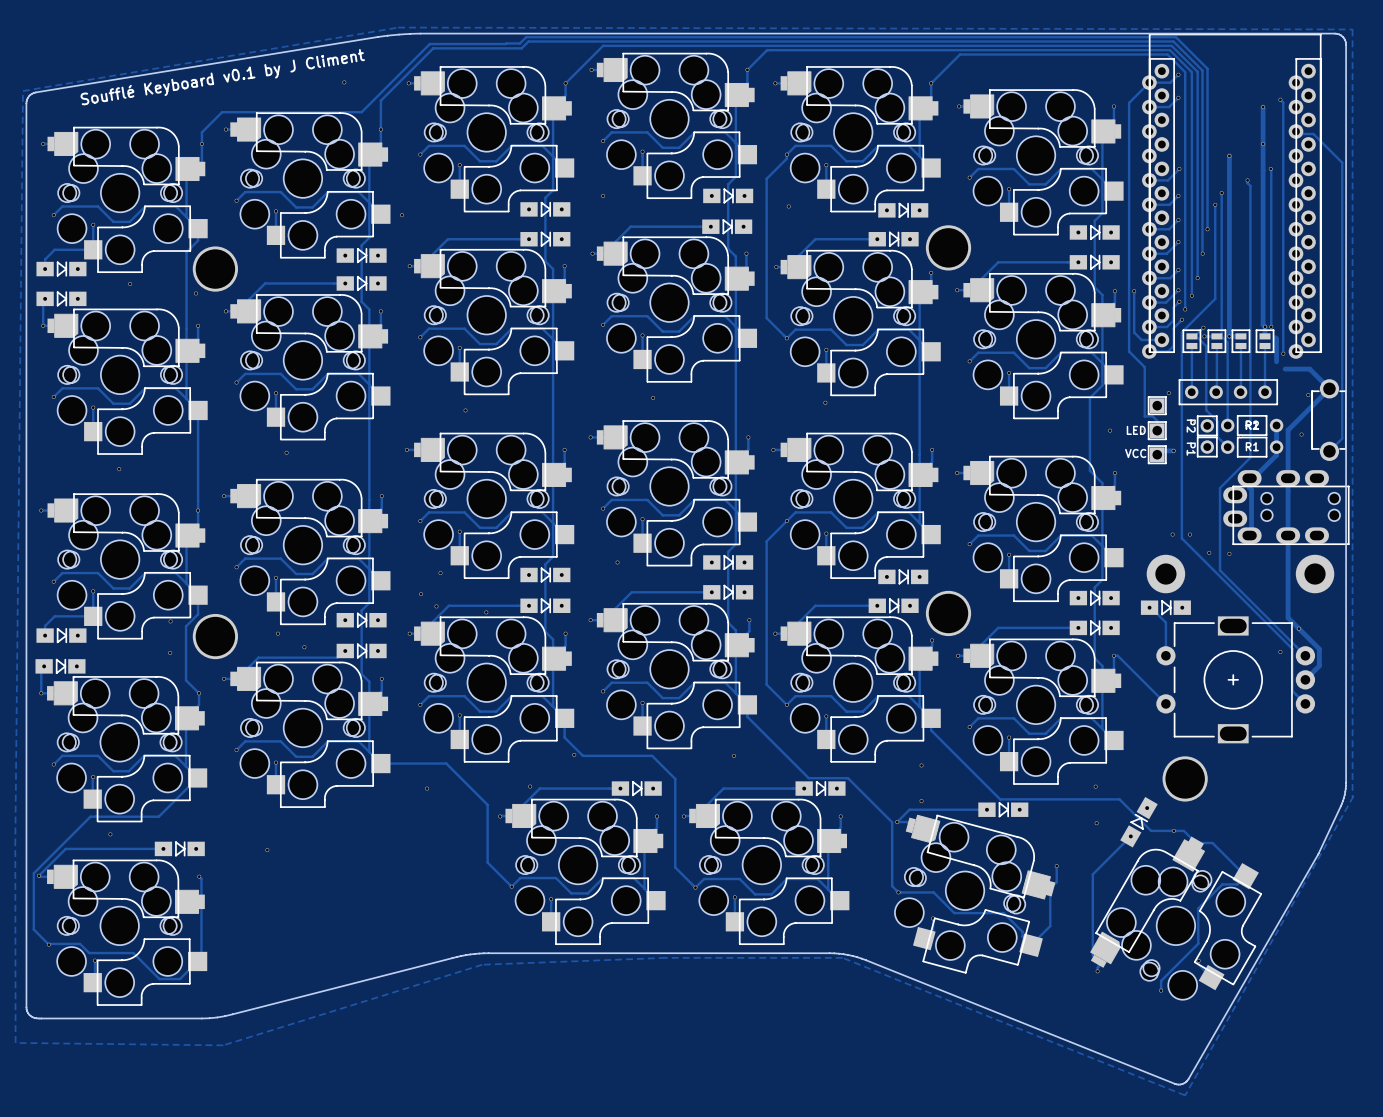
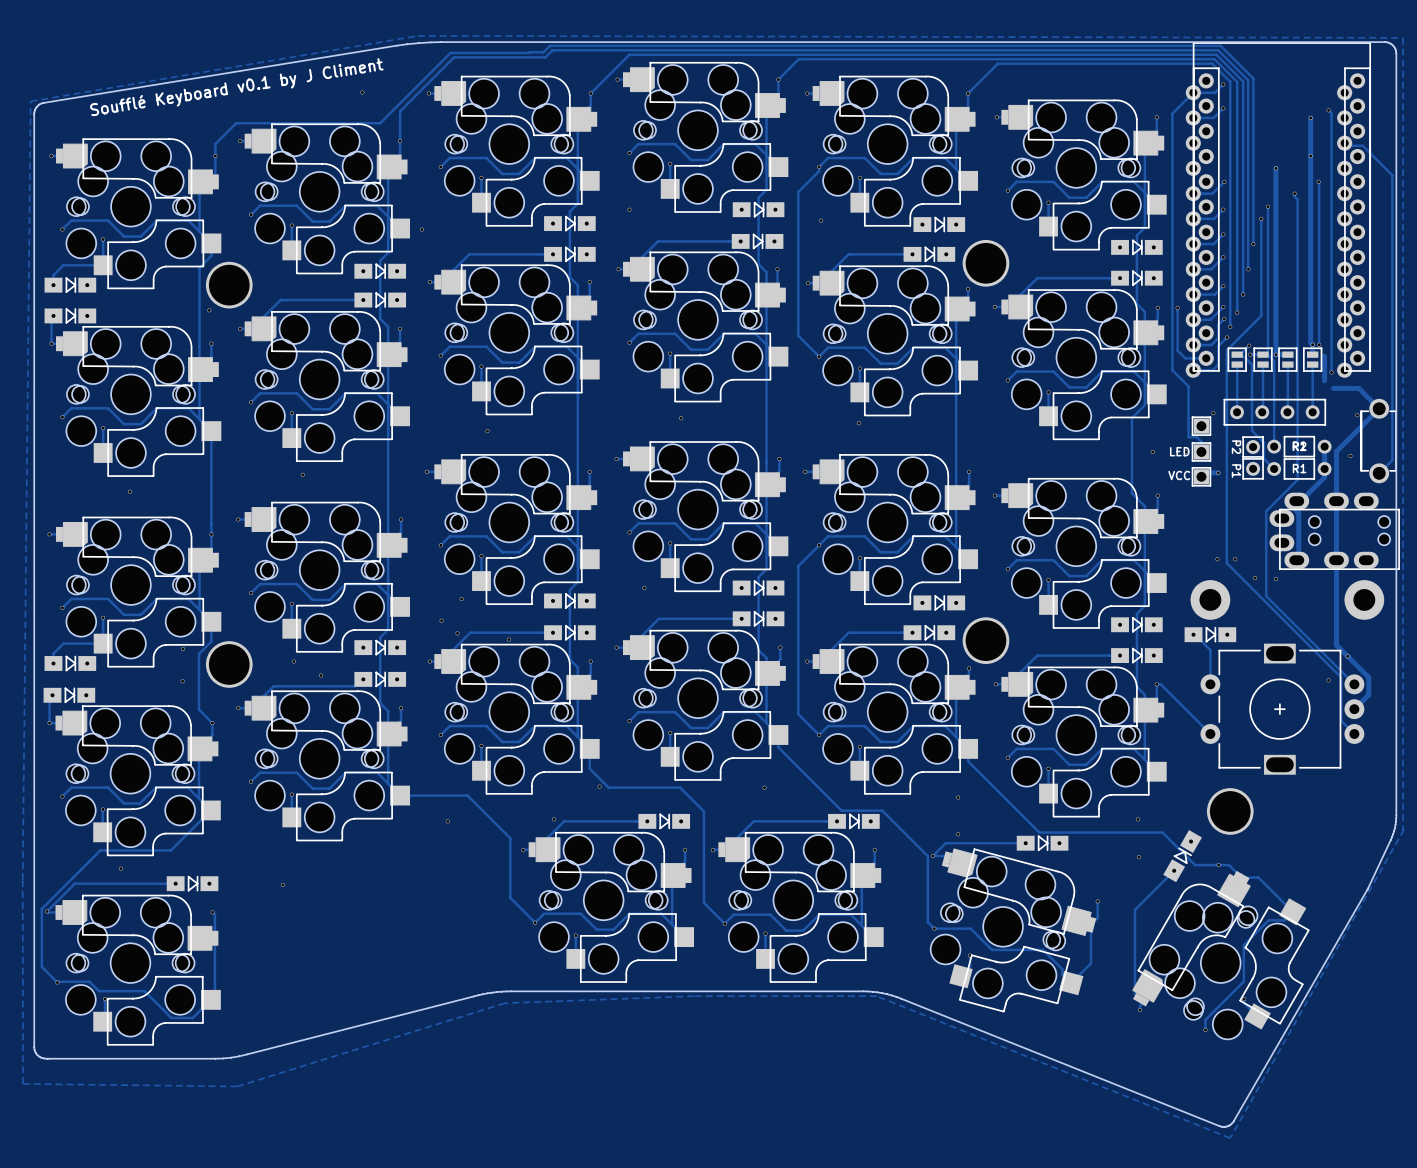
via: (130, 283) -> none

